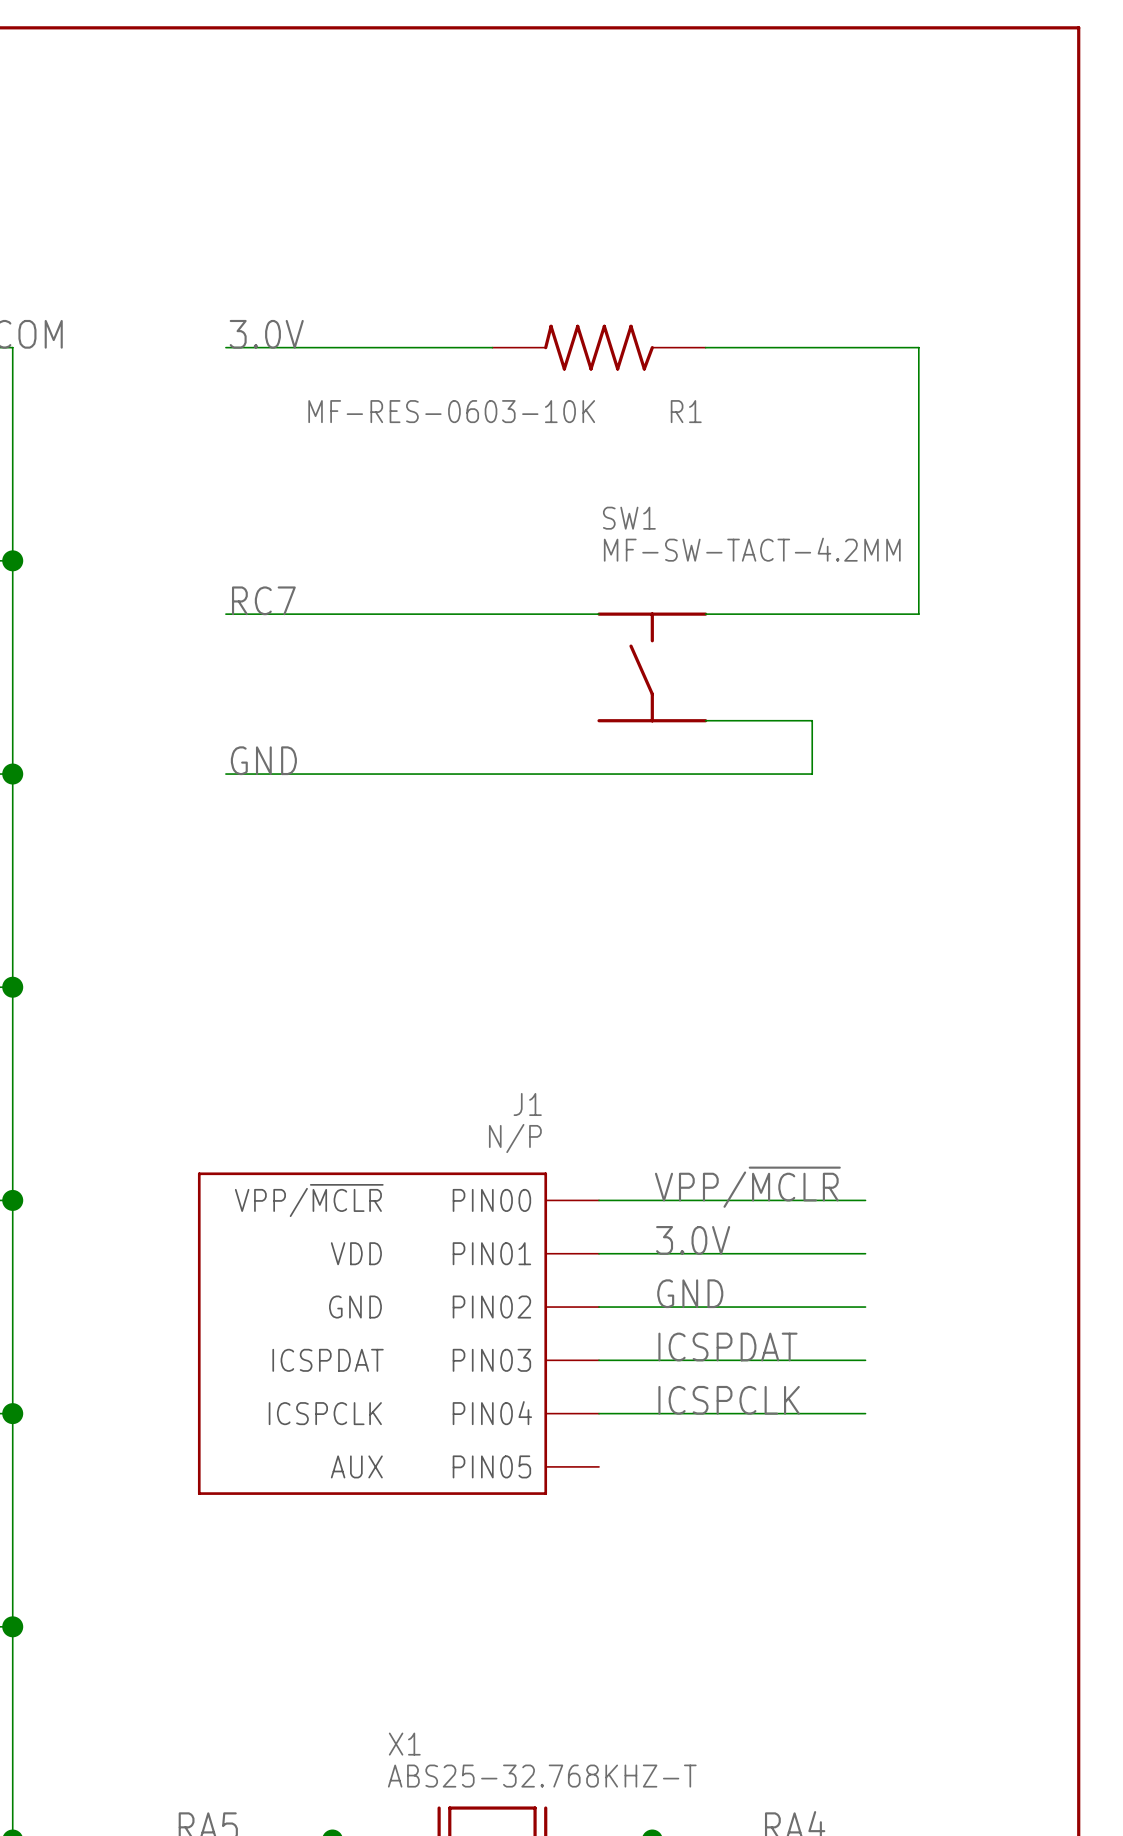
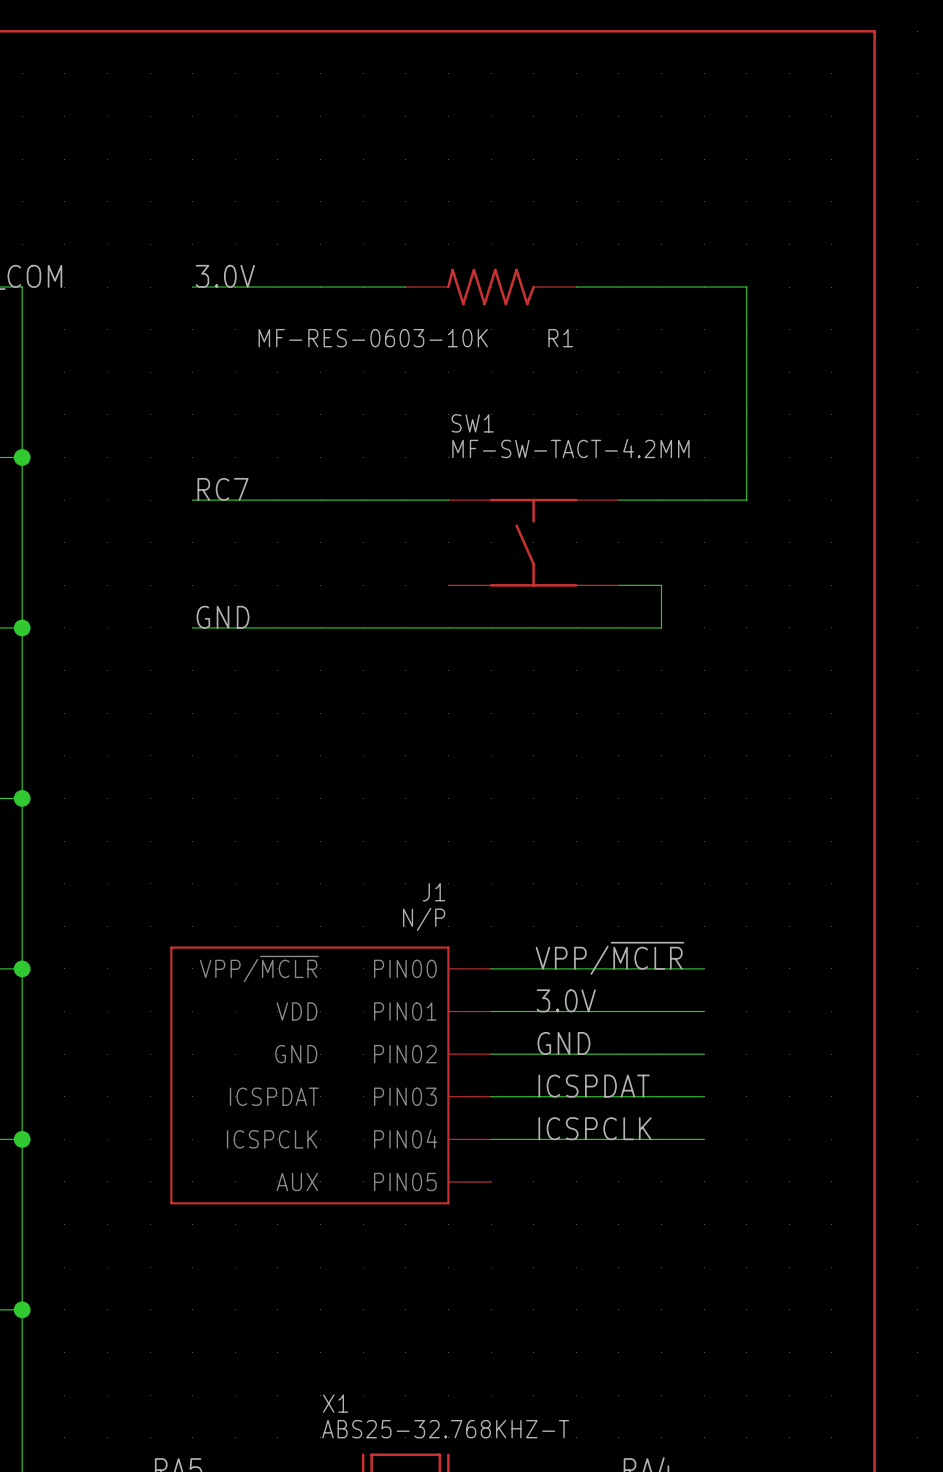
SW1 name position: SW1 (629, 518) -> SW1 (472, 423)
SW1 value position: MF-SW-TACT-4.2MM (752, 549) -> MF-SW-TACT-4.2MM (570, 448)
SW1 symbol: [597, 612, 708, 723] -> [448, 498, 619, 587]

